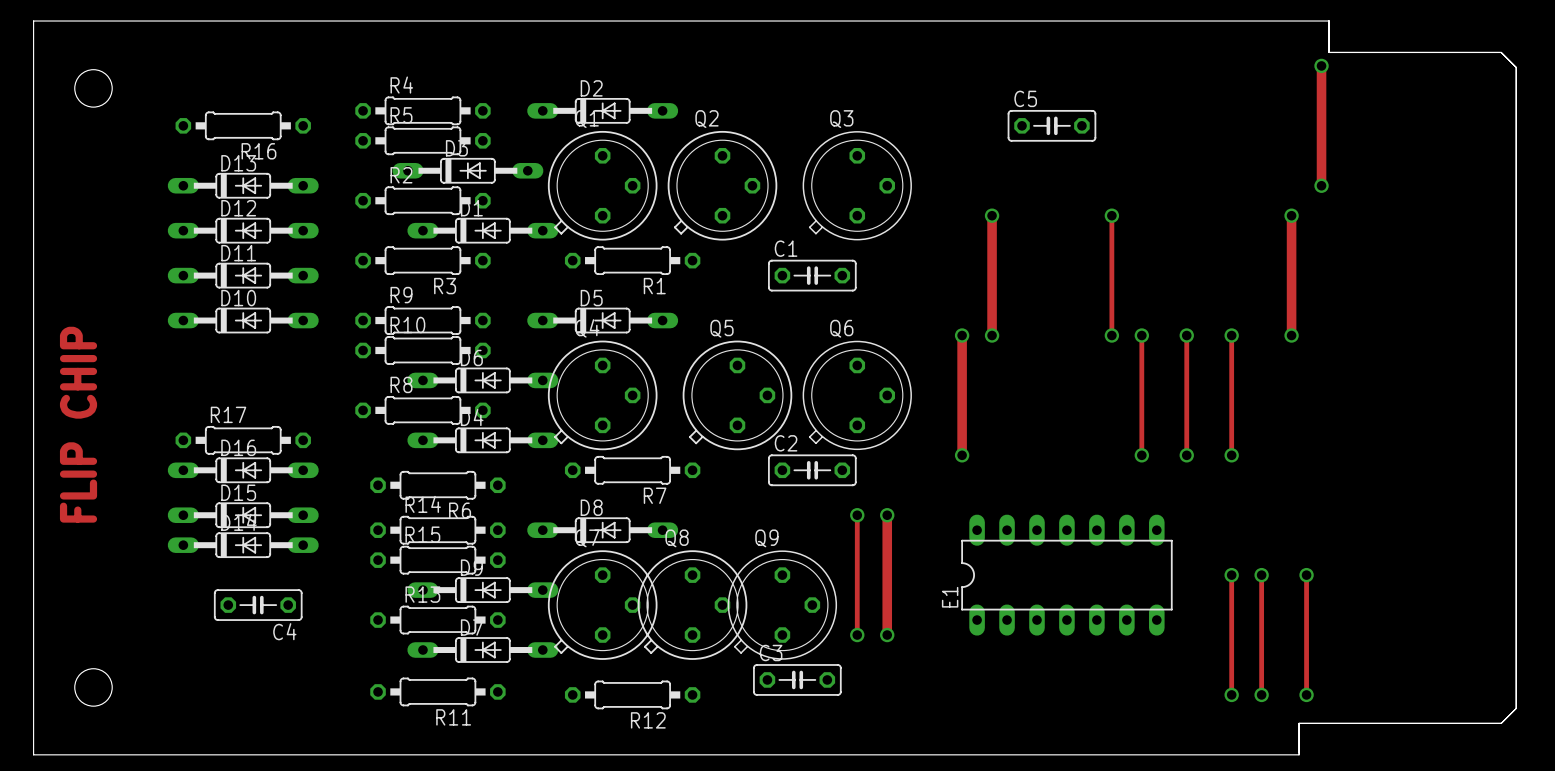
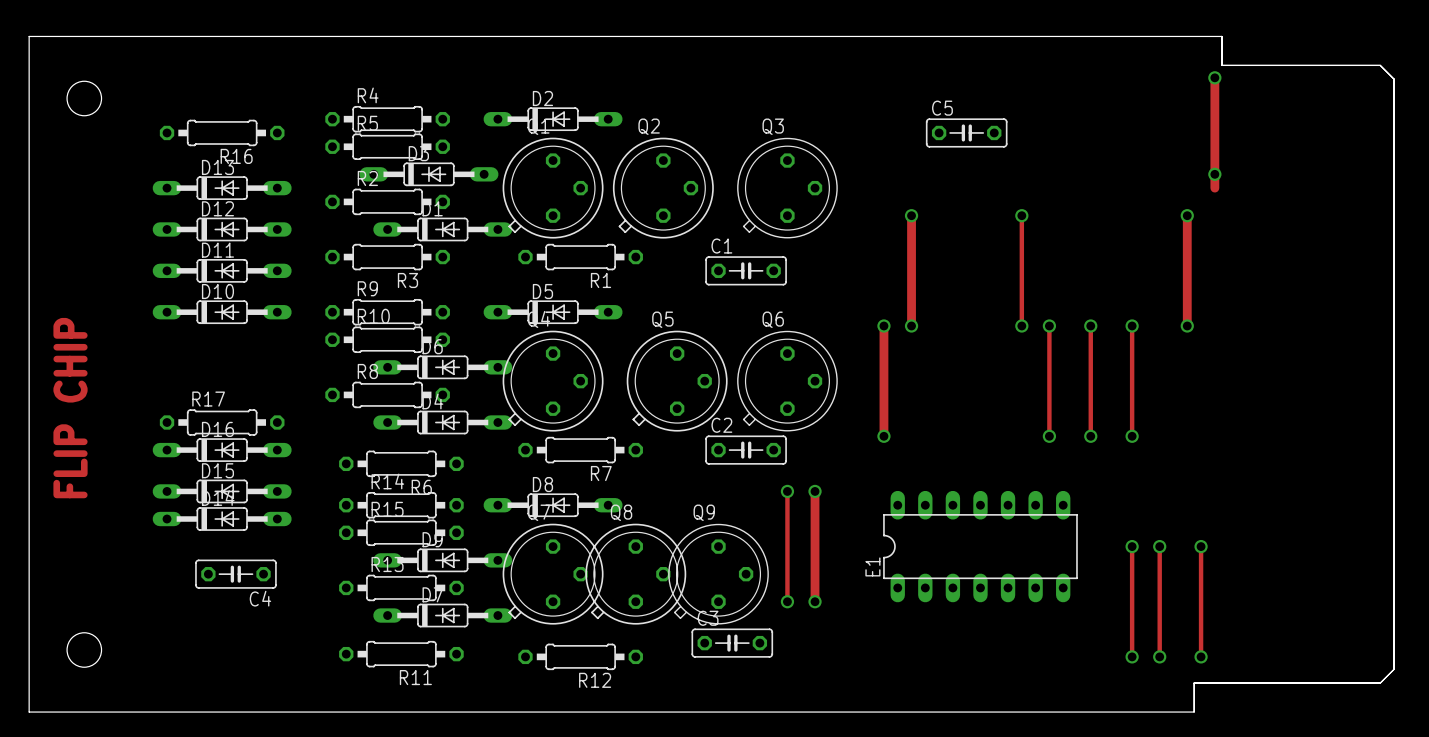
via position: (1321, 185) -> (1214, 174)

